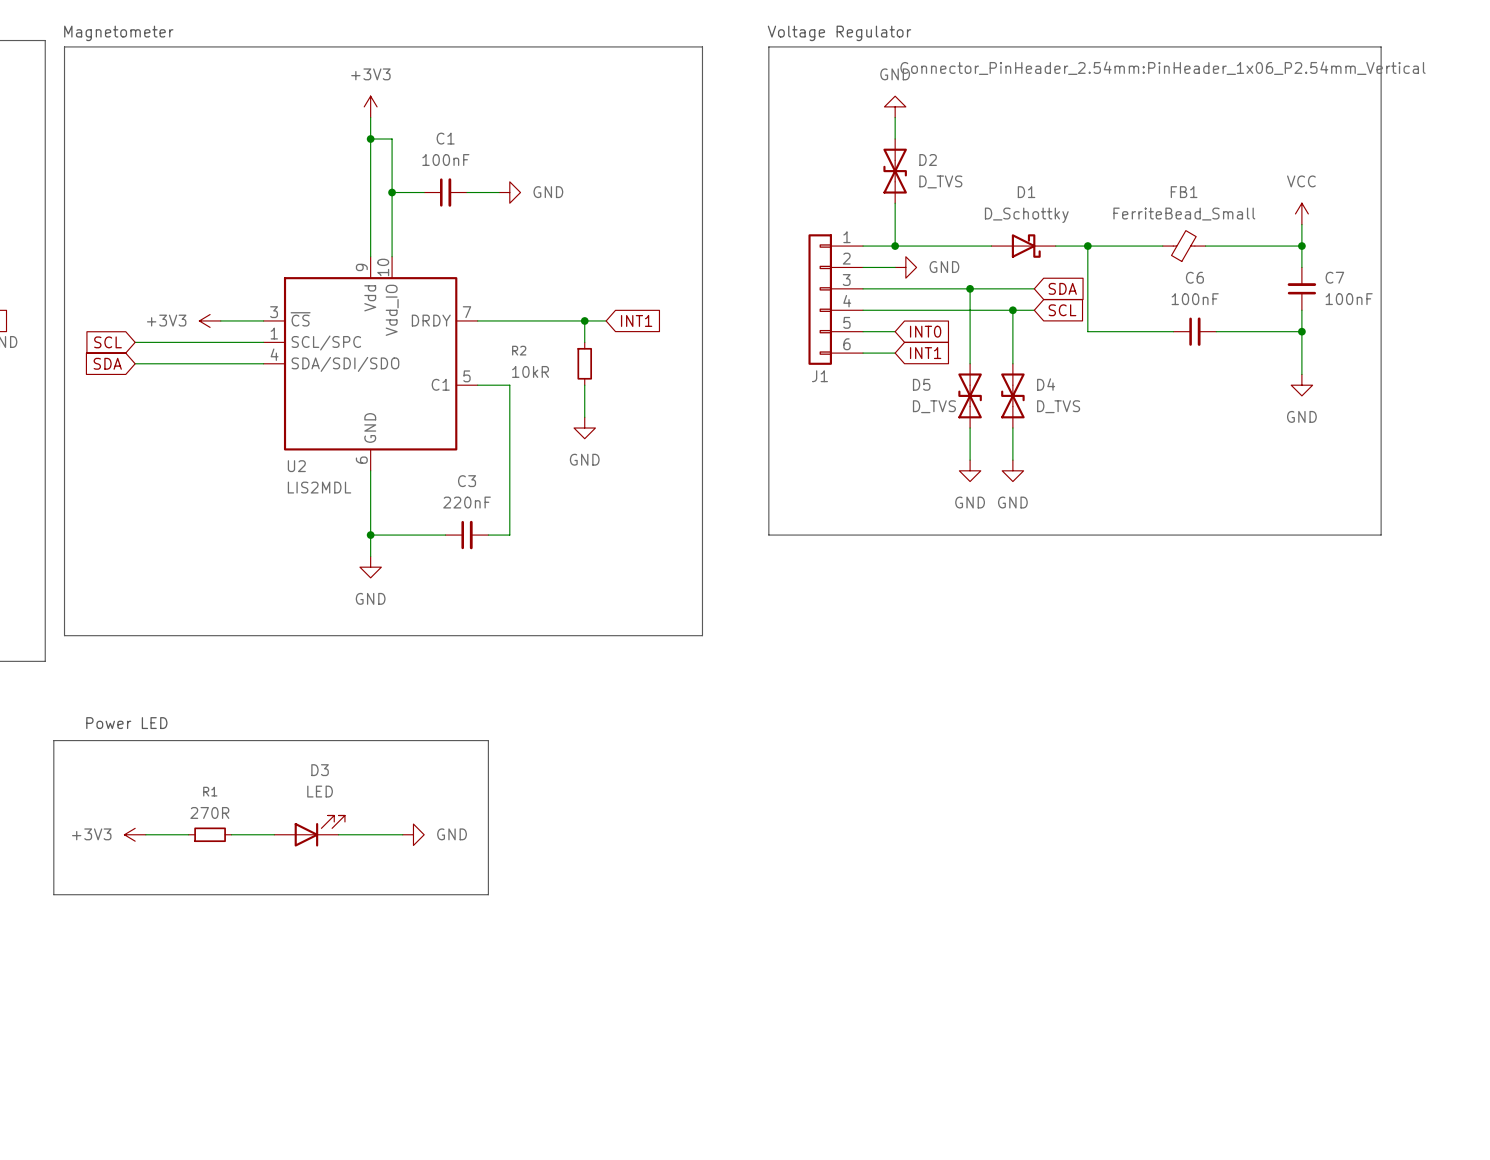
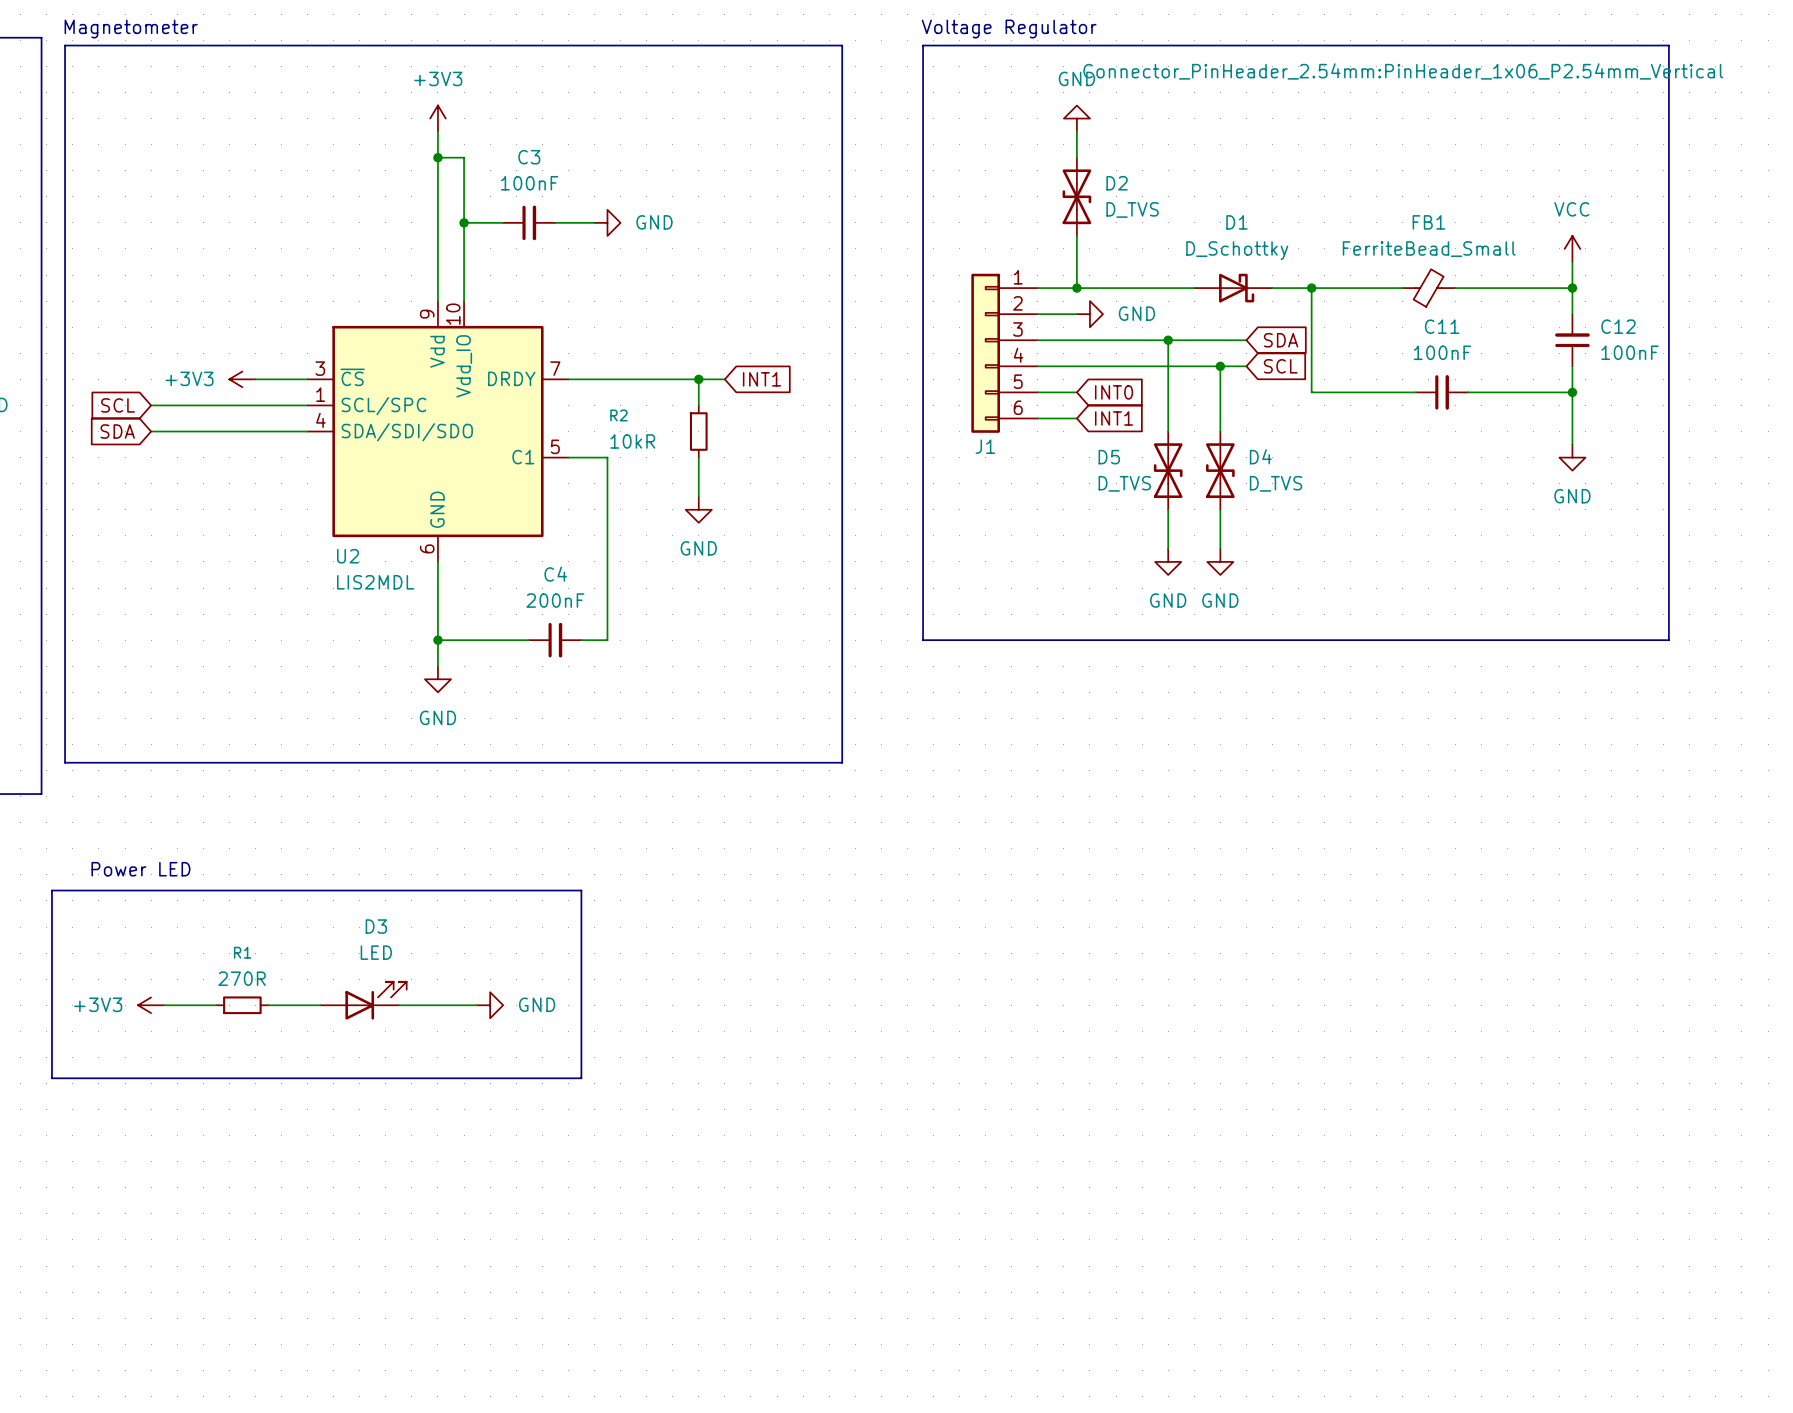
C1 name: C1 (445, 138) -> C3 (529, 157)
C6 name: C6 (1194, 277) -> C11 (1442, 326)
C7 name: C7 (1334, 277) -> C12 (1618, 326)
C3 name: C3 (467, 481) -> C4 (555, 574)
C3 value: 220nF (467, 502) -> 200nF (555, 600)

